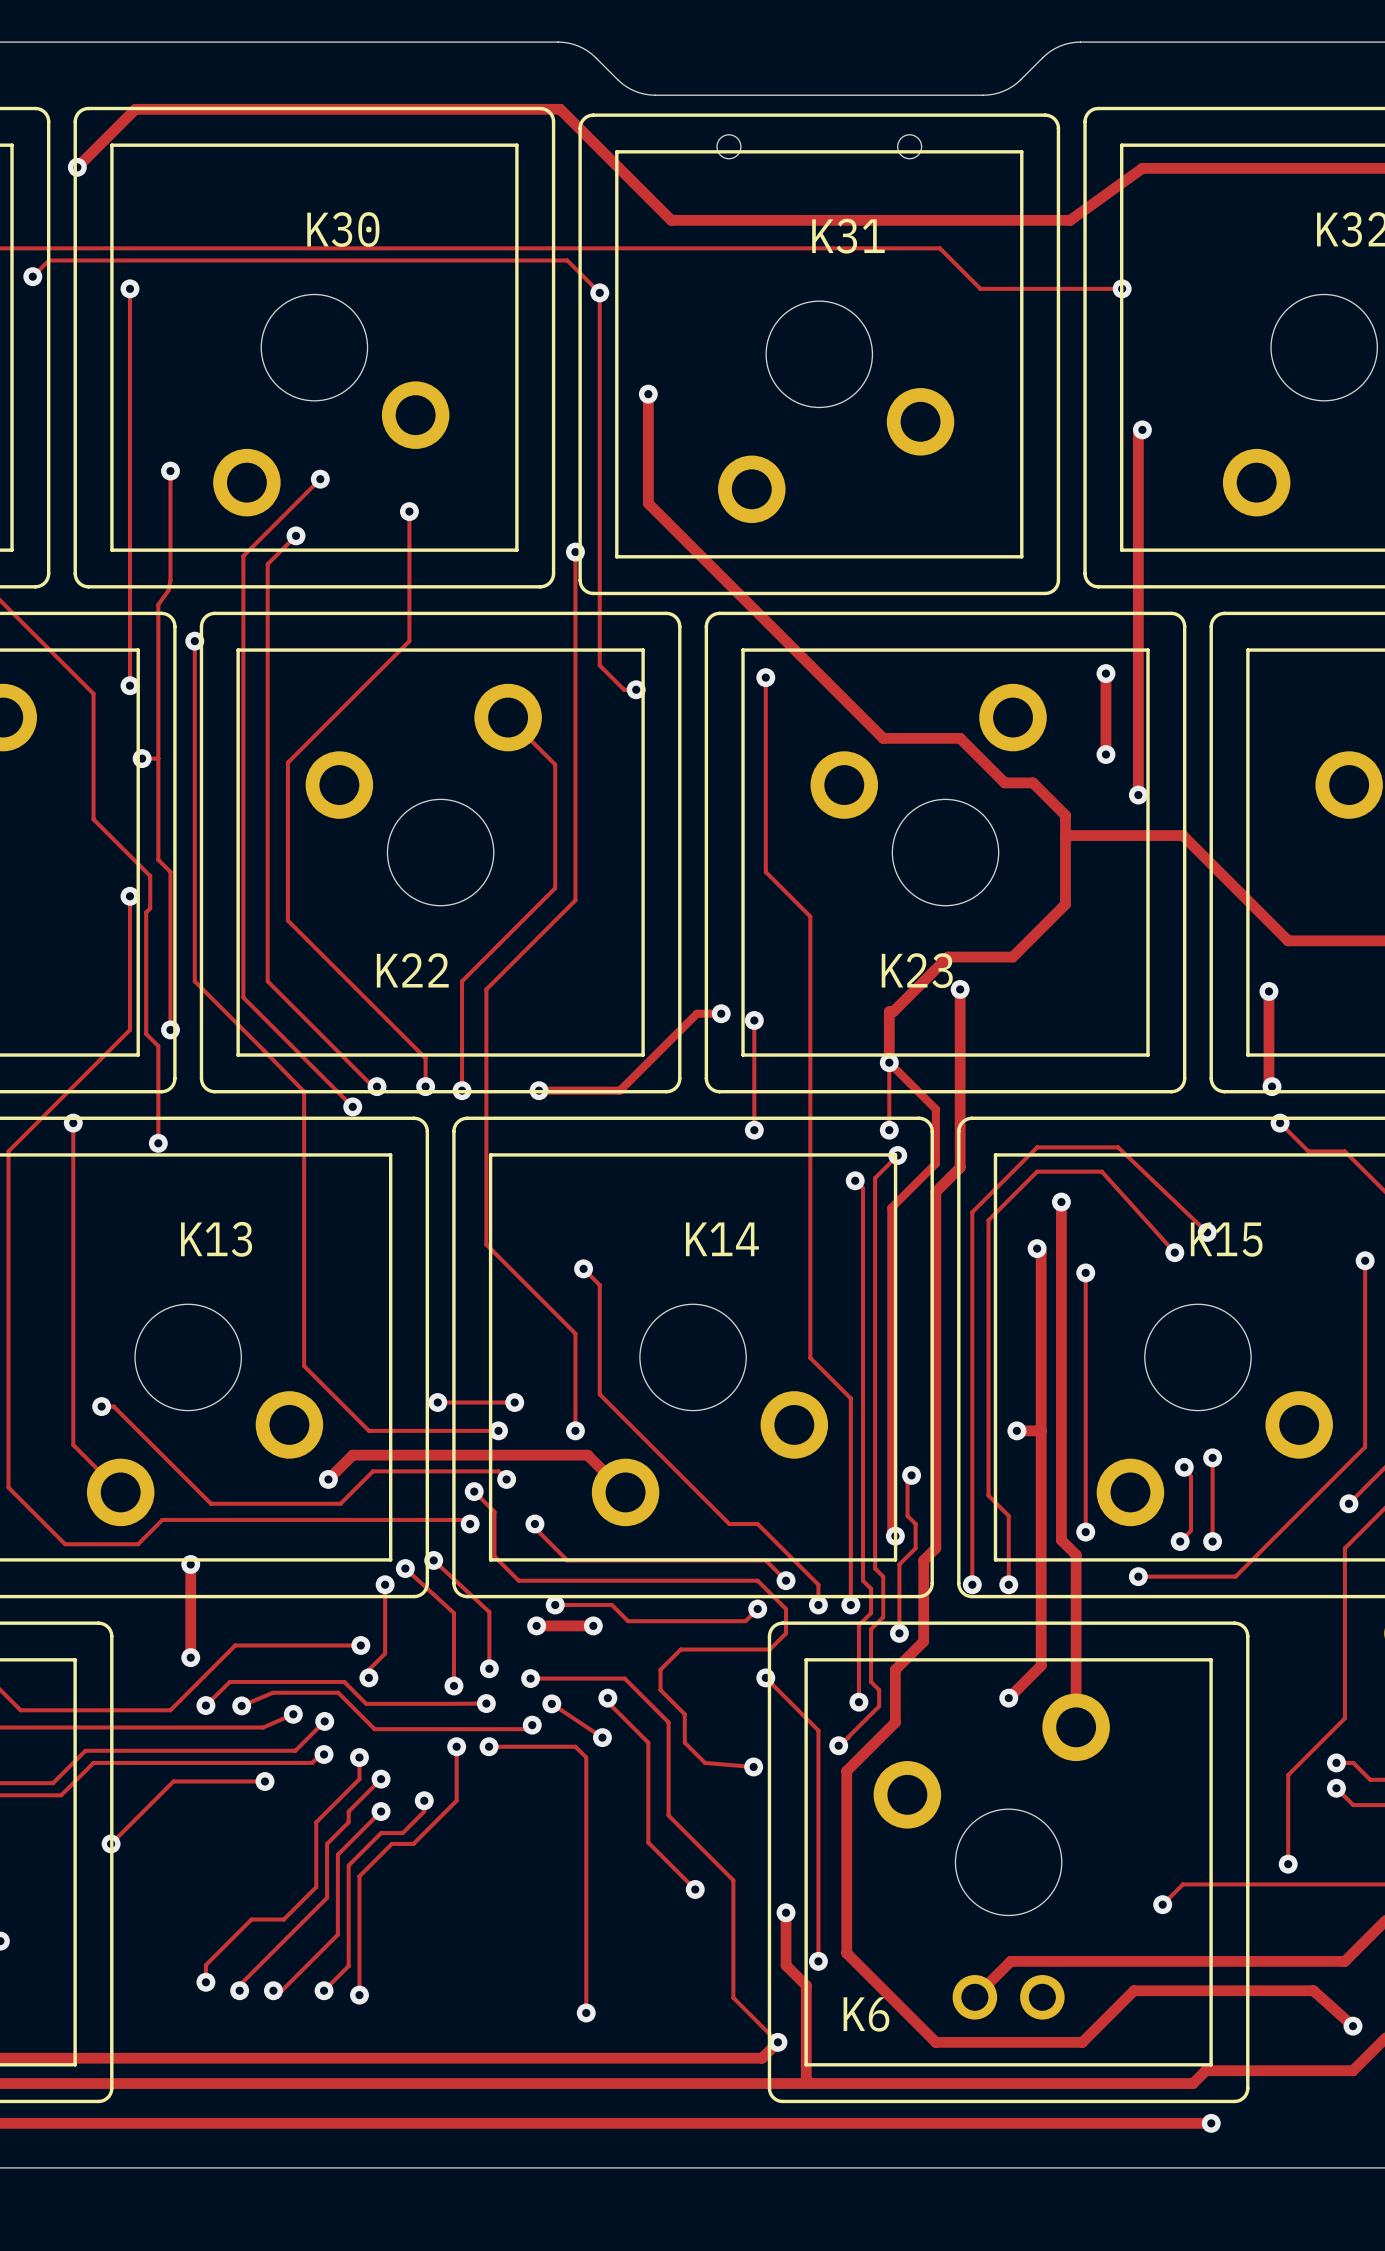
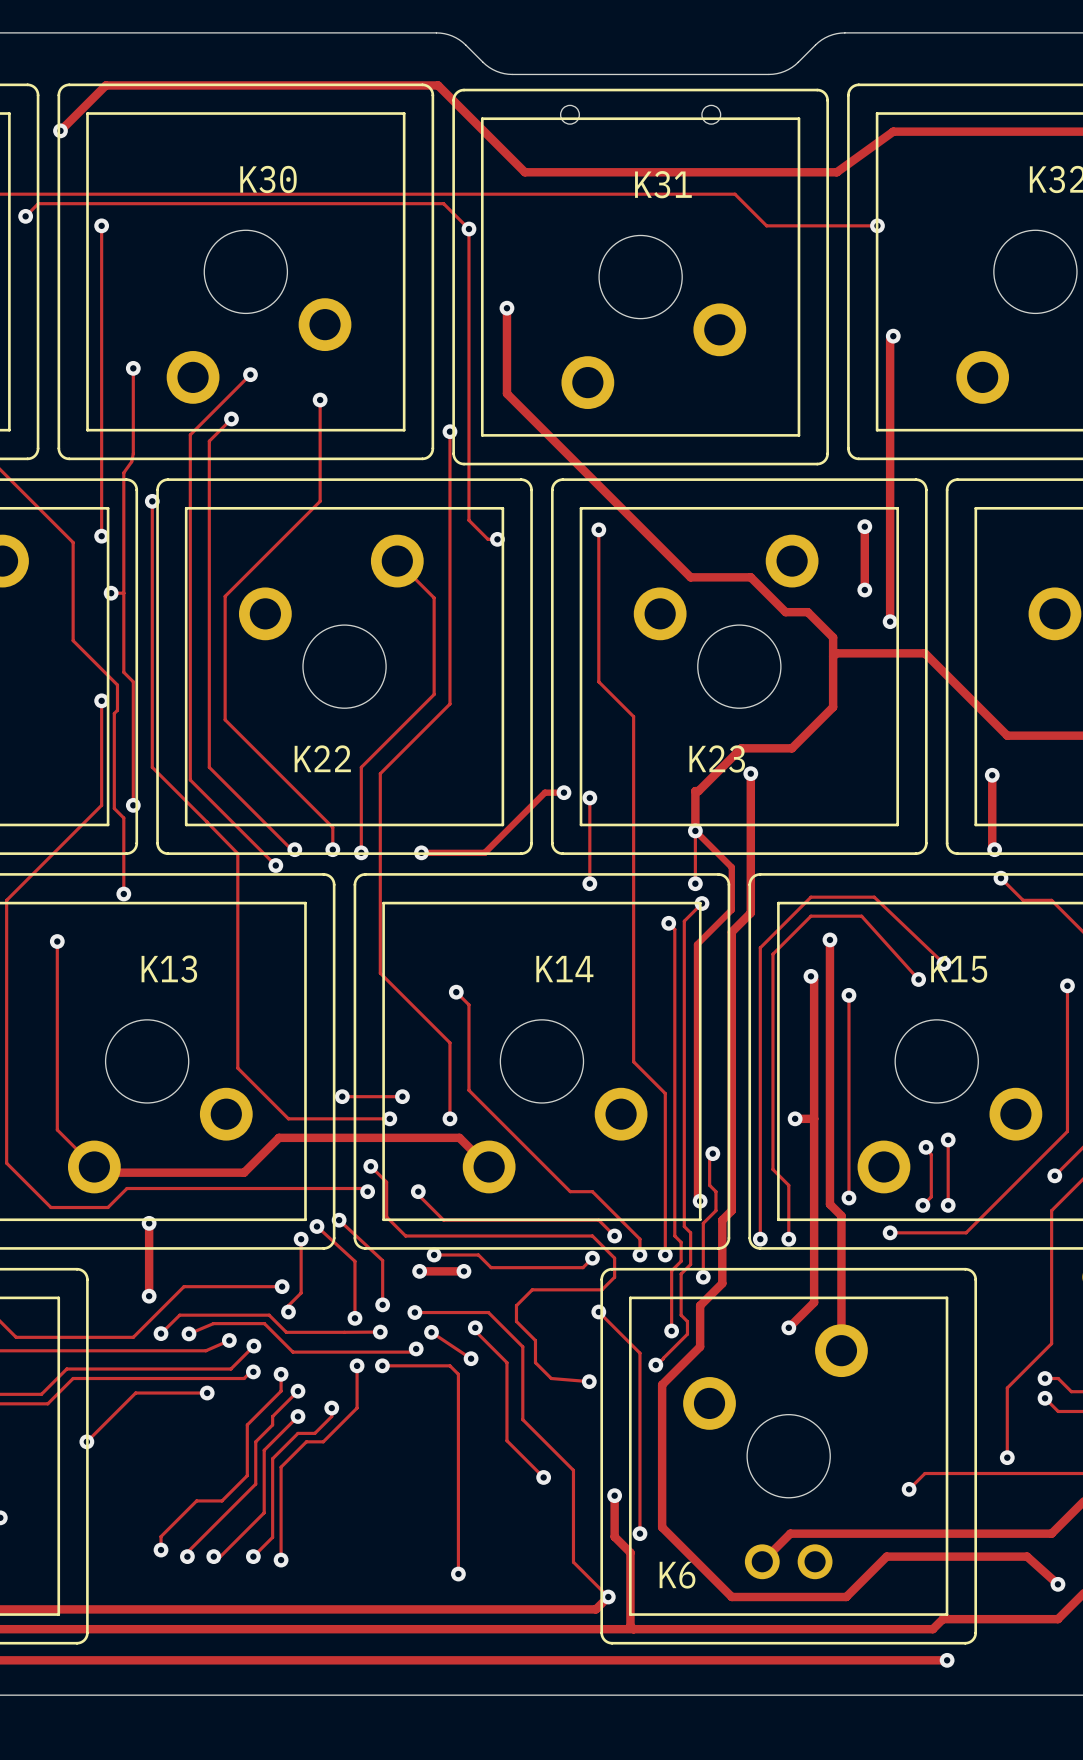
track: (73, 1123) (73, 1204) -> none
via position: (73, 1123) -> (57, 941)
track: (101, 1406) (113, 1406) (210, 1503) (340, 1503) (372, 1471) (498, 1471) (506, 1479) -> none
via: (101, 1406) -> none
track: (356, 1455) (352, 1455) (328, 1479) -> (278, 1137) (244, 1172) (100, 1172) (94, 1166)
via: (328, 1479) -> none
via: (506, 1479) -> none

